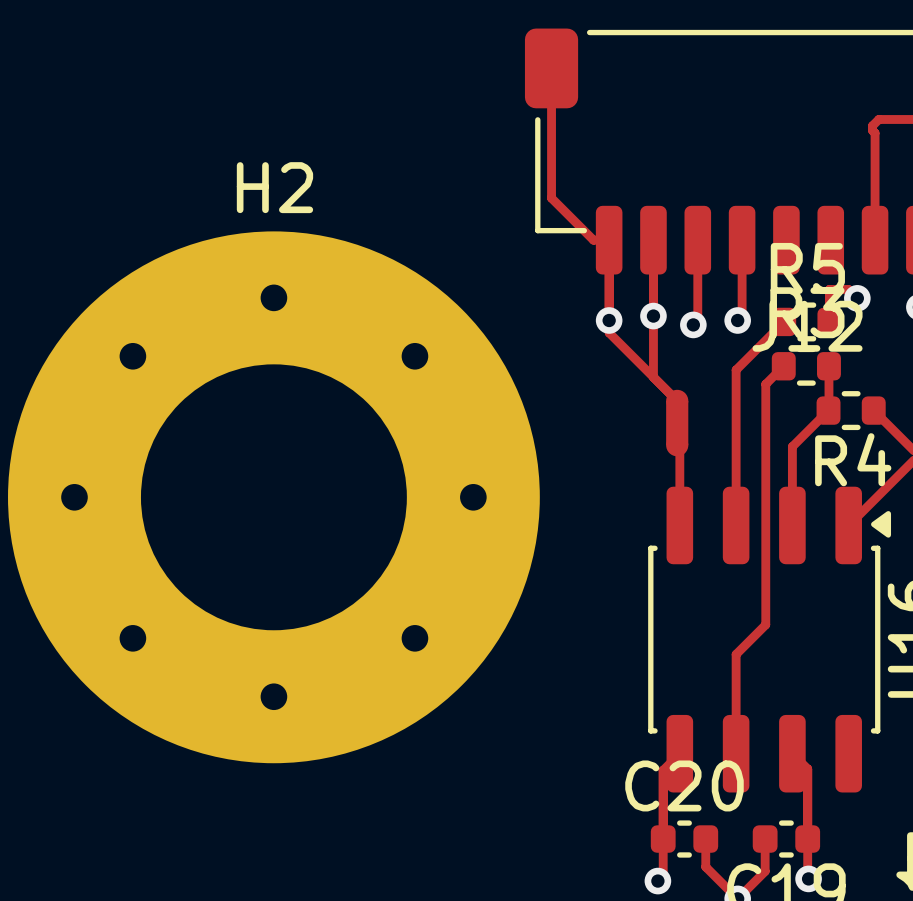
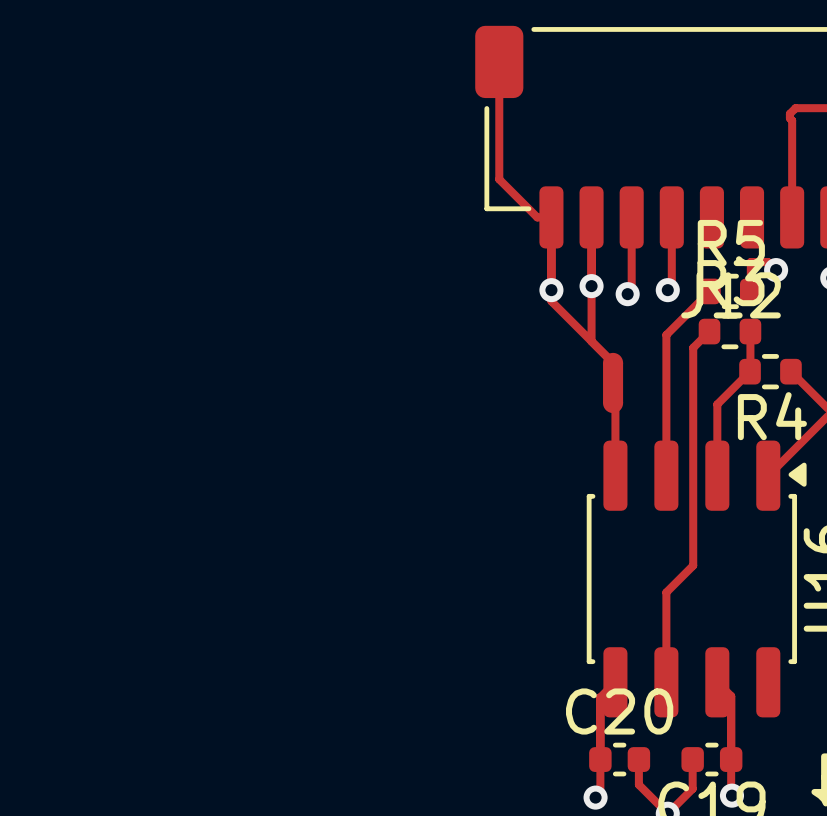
H2: (273, 497) -> none

